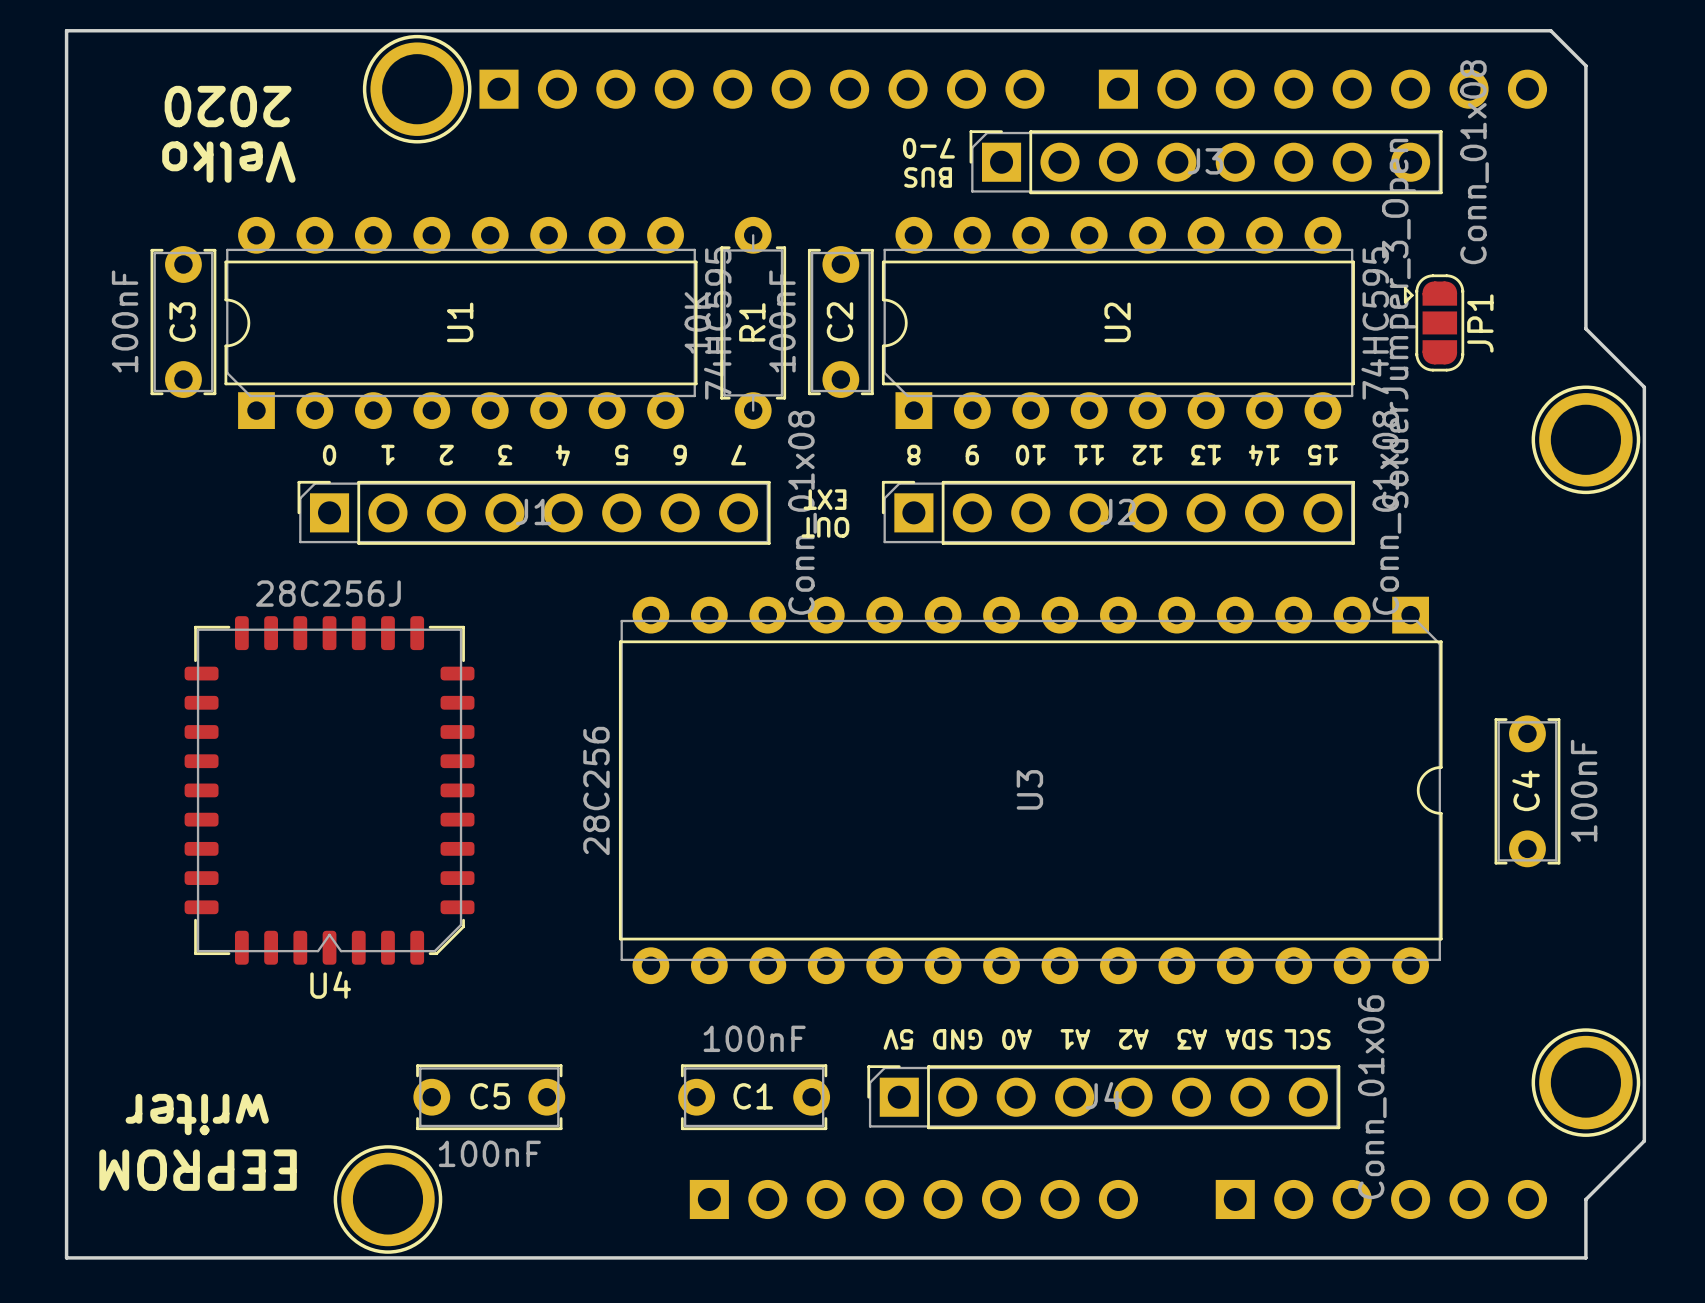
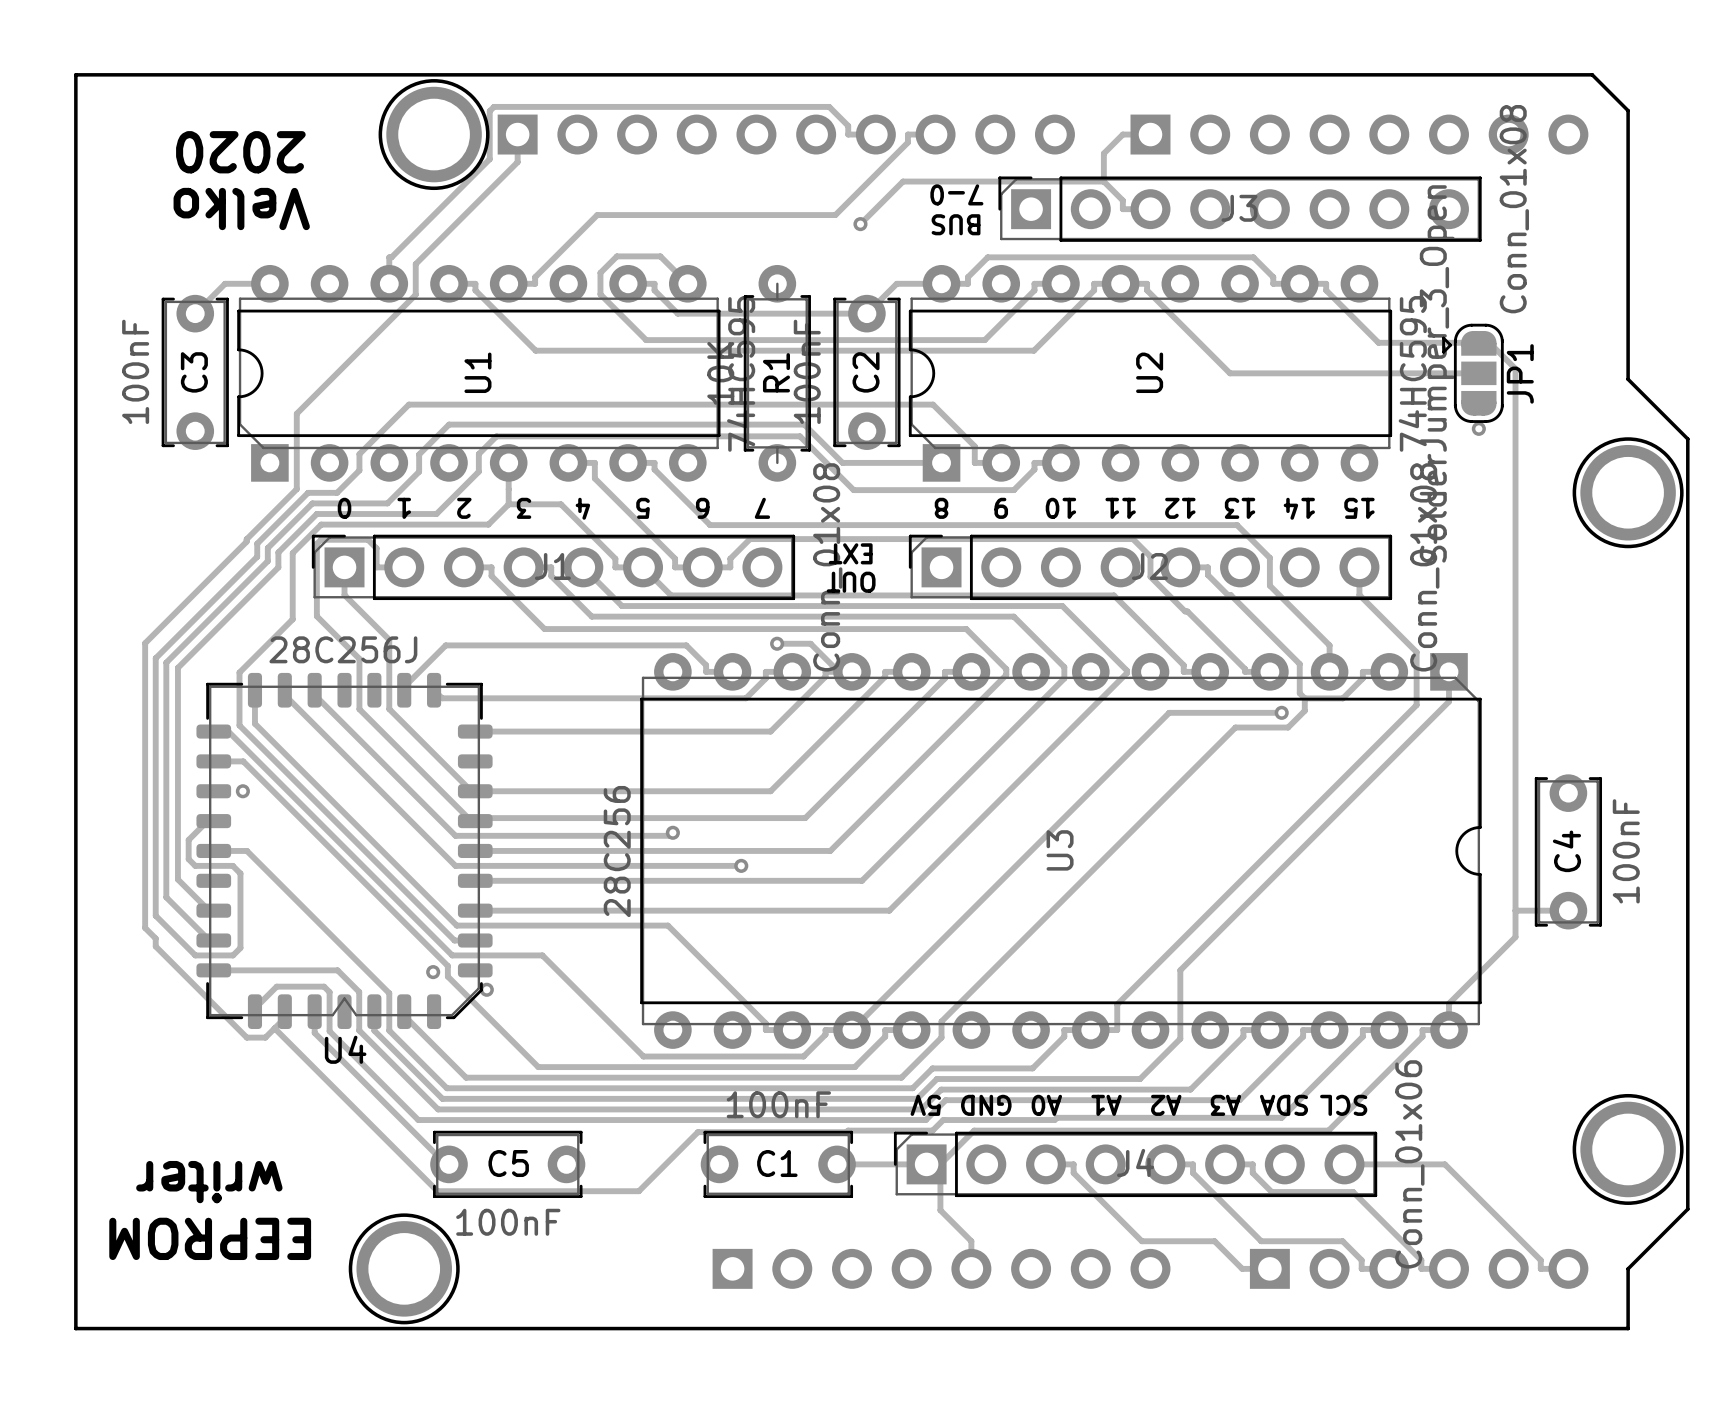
track: none -> (517, 134) (517, 162) (415, 264) (415, 294) (296, 413) (296, 489) (145, 643) (145, 927) (155, 938) (155, 946) (246, 1037) (265, 1037) (284, 1018) (284, 1011)
track: none -> (875, 134) (848, 134) (848, 125) (829, 106) (494, 106) (489, 111) (489, 159) (391, 257) (389, 257) (389, 283)
track: none -> (935, 134) (907, 134) (907, 142) (835, 215) (597, 215) (535, 277) (535, 283) (508, 283)
track: none -> (1150, 134) (1122, 134) (1103, 153) (1103, 181)
track: none -> (1103, 181) (1122, 200) (1122, 209) (1150, 209)
track: none -> (1103, 181) (903, 181) (860, 224)
via: none -> (860, 224)
track: none -> (269, 283) (225, 283) (195, 313)
track: none -> (448, 283) (475, 283) (475, 290) (535, 350) (1033, 350) (1094, 290) (1094, 283) (1147, 283) (1147, 290) (1230, 373) (1478, 373)
track: none -> (628, 283) (654, 283) (654, 290) (677, 313) (866, 313) (896, 283) (967, 283) (967, 277) (987, 257) (1253, 257) (1273, 277) (1273, 283) (1326, 283) (1326, 290) (1378, 342) (1489, 342) (1515, 368) (1515, 937) (1448, 1003) (1448, 1030) (1422, 1030) (1422, 1036) (1328, 1130) (974, 1130) (940, 1164)
track: none -> (687, 283) (660, 256) (616, 256) (600, 272) (600, 294) (646, 340) (984, 340) (1034, 290) (1034, 283) (1060, 283)
via: none -> (1478, 428)
track: none -> (508, 462) (508, 504)
track: none -> (568, 462) (594, 462) (594, 478) (675, 558) (675, 567) (730, 567) (730, 558) (750, 539) (1132, 539) (1150, 556) (1150, 576) (1245, 669) (1245, 671) (1269, 671)
track: none -> (628, 462) (654, 462) (654, 469) (710, 525) (1237, 525) (1269, 557) (1269, 585) (1329, 645) (1329, 671)
track: none -> (941, 462) (842, 462) (804, 424) (449, 424) (419, 454) (419, 471) (387, 503) (312, 503) (267, 548) (267, 561) (166, 662) (166, 897) (209, 940) (213, 940)
track: none -> (1001, 462) (974, 462) (974, 446) (933, 404) (408, 404) (359, 454) (359, 470) (337, 492) (308, 492) (257, 543) (257, 556) (155, 658) (155, 915) (195, 955) (233, 955) (240, 947) (240, 873) (232, 865) (195, 865) (188, 859) (188, 839) (207, 821) (213, 821)
track: none -> (1060, 462) (1034, 462) (1034, 469) (1013, 490) (853, 490) (799, 436) (496, 436) (478, 454) (478, 471) (436, 514) (316, 514) (278, 552) (278, 567) (177, 667) (177, 879) (209, 910) (213, 910)
track: none -> (508, 504) (560, 504) (615, 558) (615, 567) (643, 567) (671, 595) (1113, 595) (1183, 665) (1183, 671) (1210, 671)
track: none -> (508, 504) (488, 524) (321, 524) (292, 553) (292, 619) (239, 672) (239, 725) (454, 940) (475, 940)
track: none -> (344, 567) (344, 595) (389, 639) (389, 709) (471, 791) (770, 791) (885, 676) (885, 671) (911, 671)
track: none -> (404, 567) (376, 567) (376, 548) (367, 539) (321, 539) (316, 543) (316, 616) (359, 658) (359, 709) (471, 821) (475, 821) (478, 818) (805, 818) (944, 678) (944, 671) (971, 671)
track: none -> (463, 567) (491, 567) (491, 576) (544, 629) (966, 629) (1006, 669) (1006, 675) (830, 850) (475, 850)
track: none -> (523, 567) (551, 567) (551, 576) (591, 616) (1013, 616) (1064, 667) (1064, 678) (861, 880) (475, 880)
track: none -> (583, 567) (621, 606) (1062, 606) (1126, 670) (1126, 673) (889, 910) (475, 910)
track: none -> (1180, 567) (1207, 567) (1207, 575) (1227, 595) (1230, 595) (1299, 664) (1299, 693) (1304, 698)
track: none -> (1359, 567) (1359, 595) (1416, 652) (1416, 705) (1117, 1004) (1117, 1030) (1064, 1030) (1064, 1036) (1032, 1068) (932, 1068) (912, 1088) (446, 1088) (389, 1030) (389, 993) (246, 850) (213, 850)
track: none -> (777, 643) (810, 643) (838, 671)
via: none -> (777, 643)
track: none -> (732, 671) (706, 671) (706, 665) (686, 645) (445, 645) (404, 686) (404, 690)
track: none -> (792, 671) (765, 671) (765, 678) (745, 698) (442, 698) (434, 690)
track: none -> (851, 671) (825, 671) (825, 676) (770, 731) (475, 731)
track: none -> (1389, 671) (1362, 671) (1362, 678) (1342, 698) (1304, 698)
track: none -> (1448, 671) (1448, 701) (1180, 970) (1180, 1038) (1140, 1079) (936, 1079) (917, 1098) (442, 1098) (374, 1030) (374, 1011)
track: none -> (254, 690) (254, 723) (456, 925) (667, 925) (765, 1023) (765, 1030) (792, 1030)
track: none -> (284, 690) (284, 695) (455, 865) (741, 865)
track: none -> (314, 690) (314, 694) (455, 835) (669, 835) (672, 832)
track: none -> (1304, 698) (1304, 710) (1288, 727) (1235, 727) (941, 1021) (941, 1037) (901, 1077) (466, 1077) (404, 1015) (404, 1011)
track: none -> (1281, 712) (1169, 712) (851, 1030) (825, 1030) (825, 1034) (803, 1056) (643, 1056) (542, 955) (452, 955) (228, 731) (213, 731)
via: none -> (1281, 712)
track: none -> (213, 761) (243, 761) (447, 966) (447, 976) (538, 1067) (854, 1067) (885, 1036) (885, 1030) (911, 1030)
via: none -> (242, 791)
via: none -> (672, 832)
via: none -> (741, 865)
track: none -> (1515, 910) (1568, 910)
track: none -> (213, 970) (337, 970) (359, 991) (359, 1030) (438, 1109) (921, 1109) (941, 1089) (1190, 1089) (1243, 1036) (1243, 1030) (1269, 1030)
via: none -> (433, 972)
via: none -> (486, 989)
track: none -> (254, 1011) (254, 1008) (276, 986) (324, 986) (329, 992) (329, 1031) (418, 1120) (925, 1120) (945, 1100) (1239, 1100) (1303, 1036) (1303, 1030) (1329, 1030)
track: none -> (314, 1011) (314, 1032) (446, 1164) (448, 1164)
track: none -> (274, 1028) (437, 1191) (638, 1191) (697, 1132) (932, 1130) (943, 1120) (1281, 1117) (1362, 1036) (1362, 1030) (1389, 1030)
track: none -> (837, 1164) (940, 1164)
track: none -> (940, 1164) (940, 1210) (971, 1241) (971, 1268)
track: none -> (1046, 1164) (1073, 1164) (1073, 1173) (1141, 1241) (1214, 1241) (1242, 1268) (1269, 1268)
track: none -> (1165, 1164) (1193, 1164) (1193, 1173) (1261, 1241) (1342, 1241) (1361, 1260) (1361, 1268) (1389, 1268)
track: none -> (1225, 1164) (1252, 1164) (1252, 1173) (1271, 1192) (1353, 1192) (1421, 1260) (1421, 1268) (1448, 1268)
track: none -> (1344, 1164) (1444, 1164) (1540, 1260) (1540, 1268) (1568, 1268)

